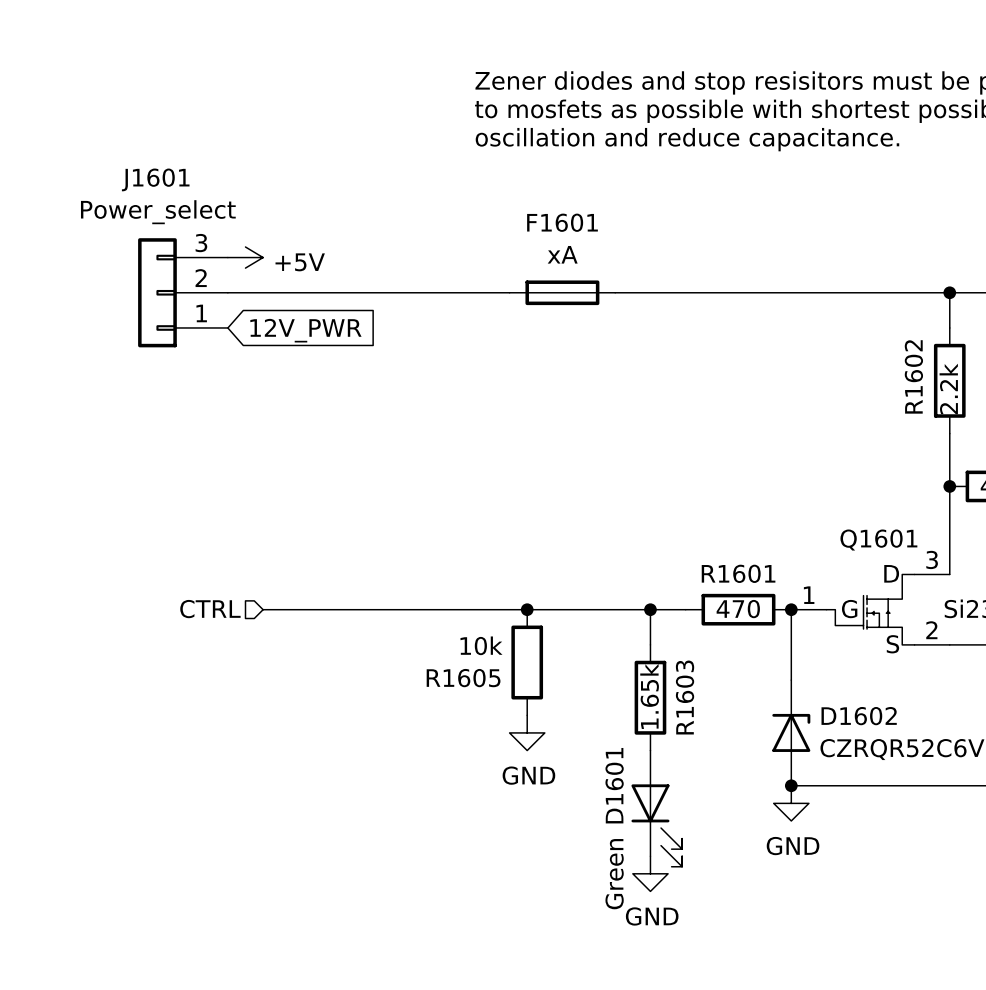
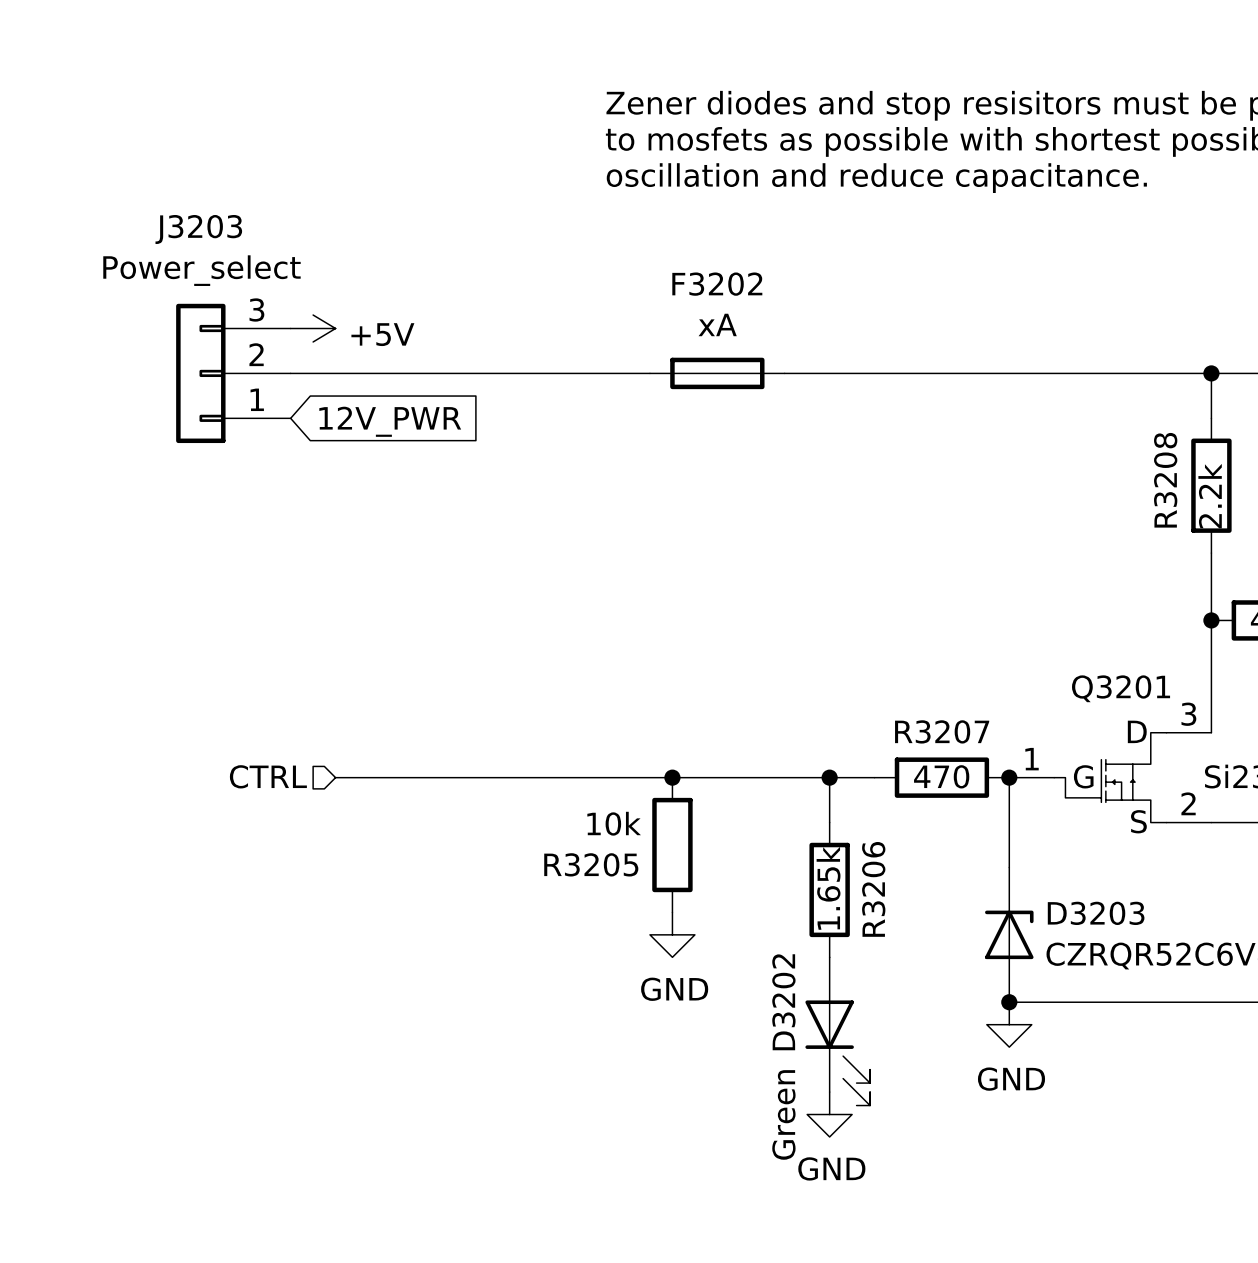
J1601 name: J1601 (155, 179) -> J3203 (198, 229)
F1601 name: F1601 (562, 222) -> F3202 (717, 284)
R1602 name: R1602 (913, 376) -> R3208 (1165, 480)
Q1601 name: Q1601 (878, 540) -> Q3201 (1121, 688)
R1601 name: R1601 (738, 573) -> R3207 (942, 731)
R1605 name: R1605 (463, 678) -> R3205 (591, 864)
R1603 name: R1603 (685, 697) -> R3206 (873, 889)
D1602 name: D1602 (859, 716) -> D3203 (1096, 913)
D1601 name: D1601 (614, 785) -> D3202 (783, 1002)

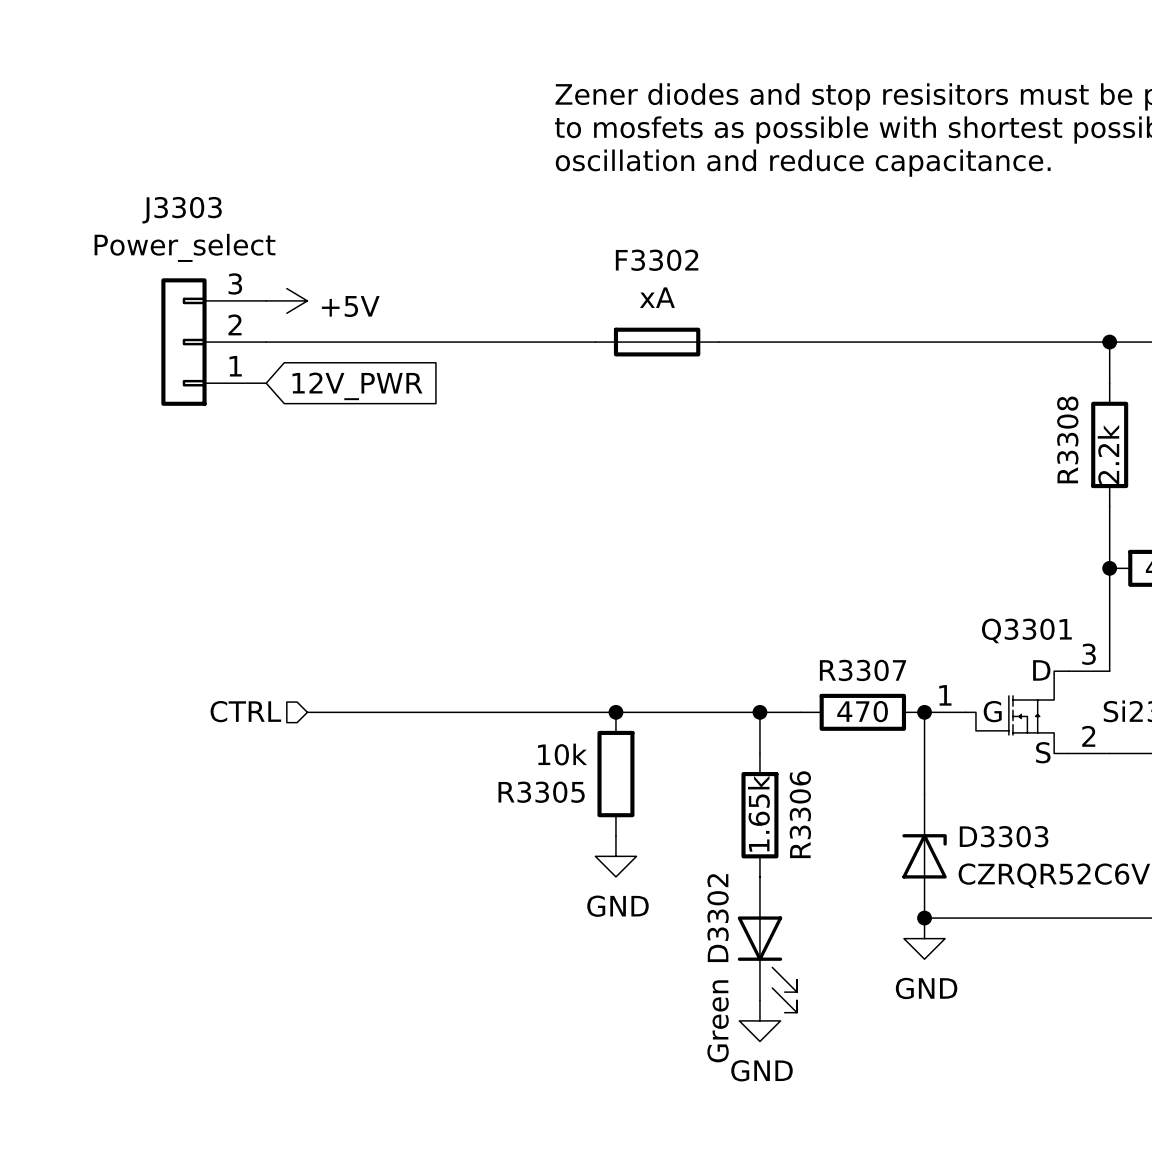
J3203 name: J3203 (198, 229) -> J3303 (182, 210)
F3202 name: F3202 (717, 284) -> F3302 (657, 260)
R3208 name: R3208 (1165, 480) -> R3308 (1067, 439)
Q3201 name: Q3201 (1121, 688) -> Q3301 (1026, 630)
R3207 name: R3207 (942, 731) -> R3307 (863, 670)
R3205 name: R3205 (591, 864) -> R3305 (541, 792)
R3206 name: R3206 (873, 889) -> R3306 (800, 814)
D3203 name: D3203 (1096, 913) -> D3303 (1004, 836)
D3202 name: D3202 (783, 1002) -> D3302 (718, 918)

